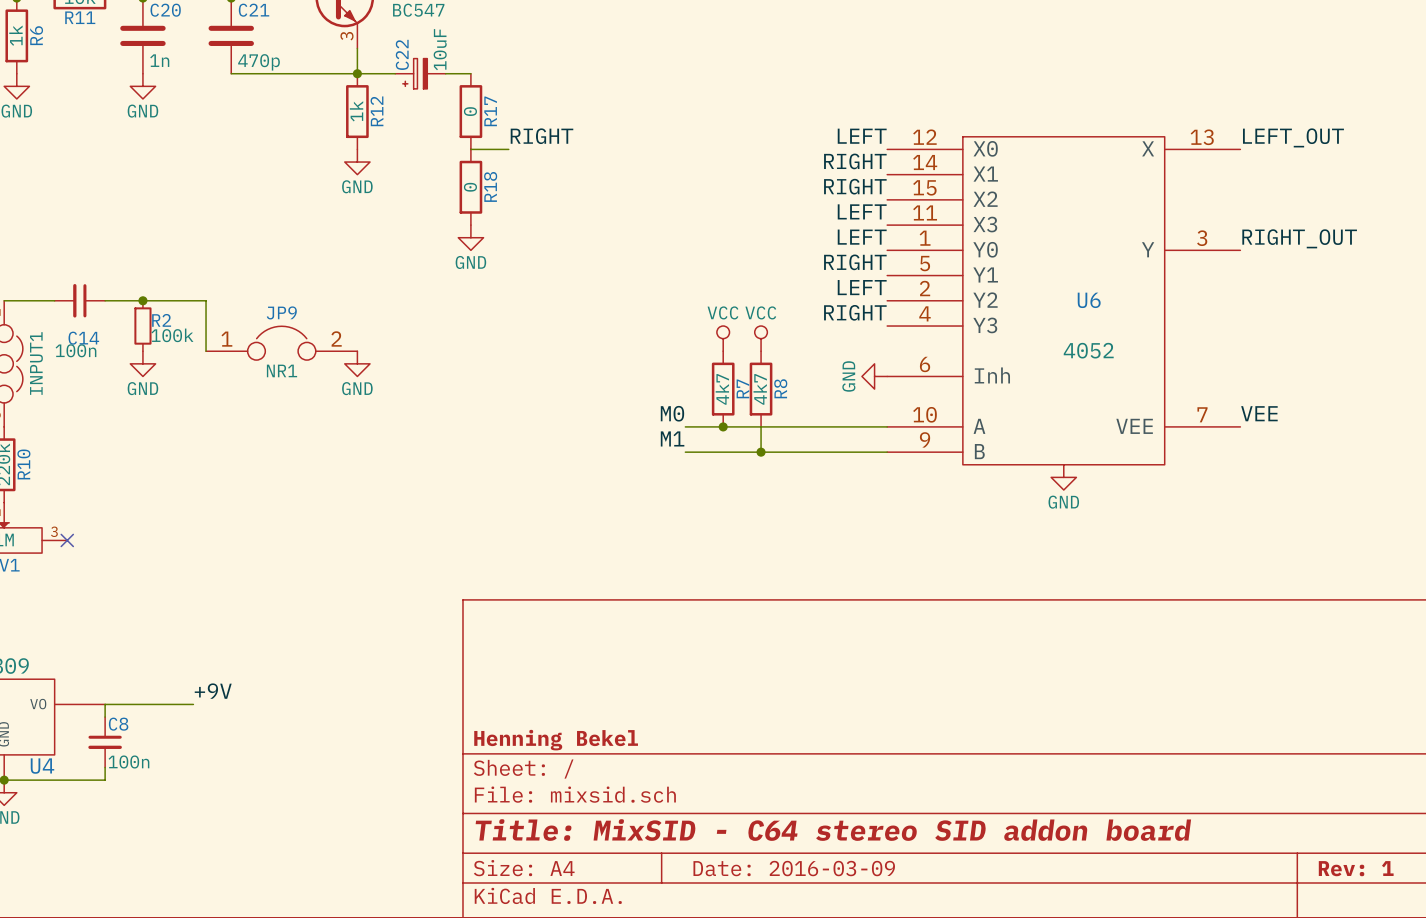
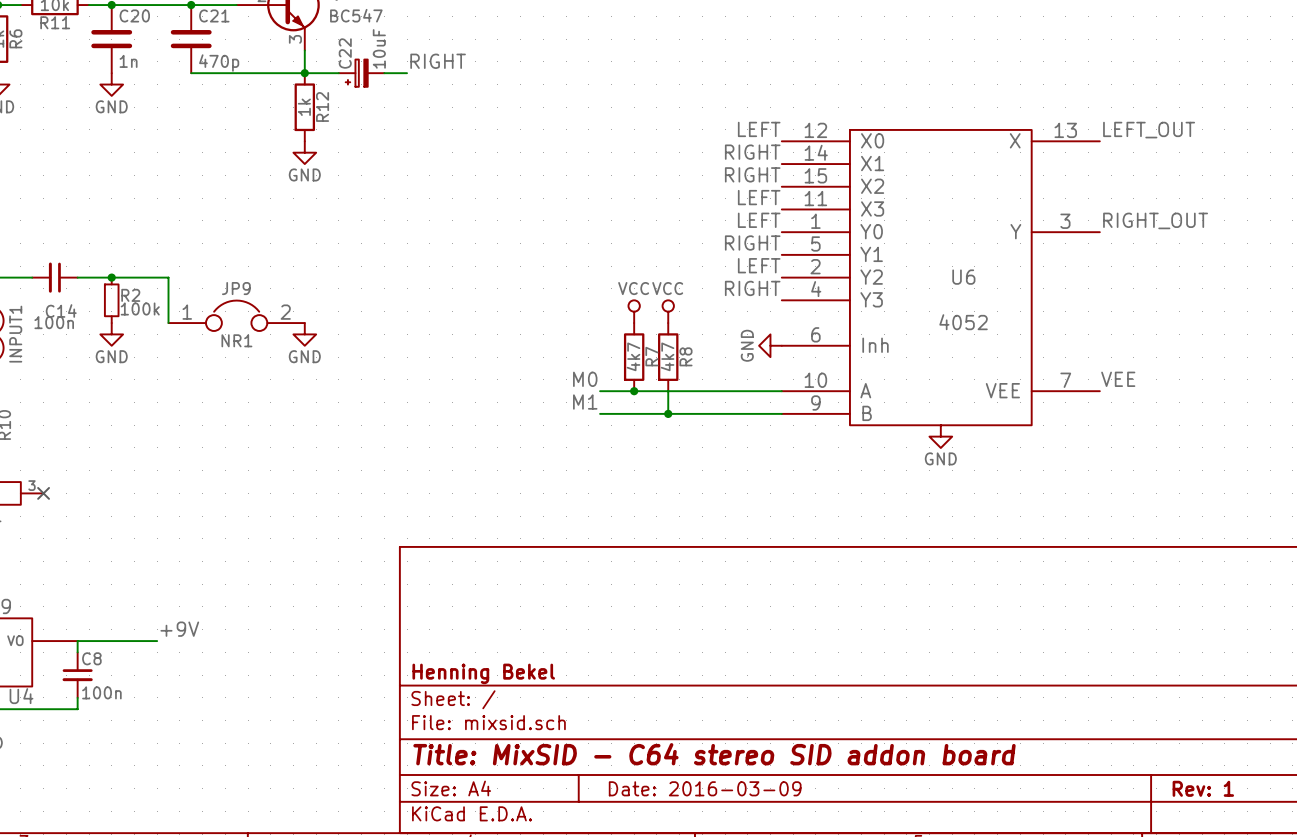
R17: 0 (470, 111) -> none
label position: RIGHT (541, 136) -> RIGHT (438, 61)
wire: (470, 149) (508, 149) -> none
R18: 0 (470, 187) -> none
power symbol: GND (470, 237) -> none

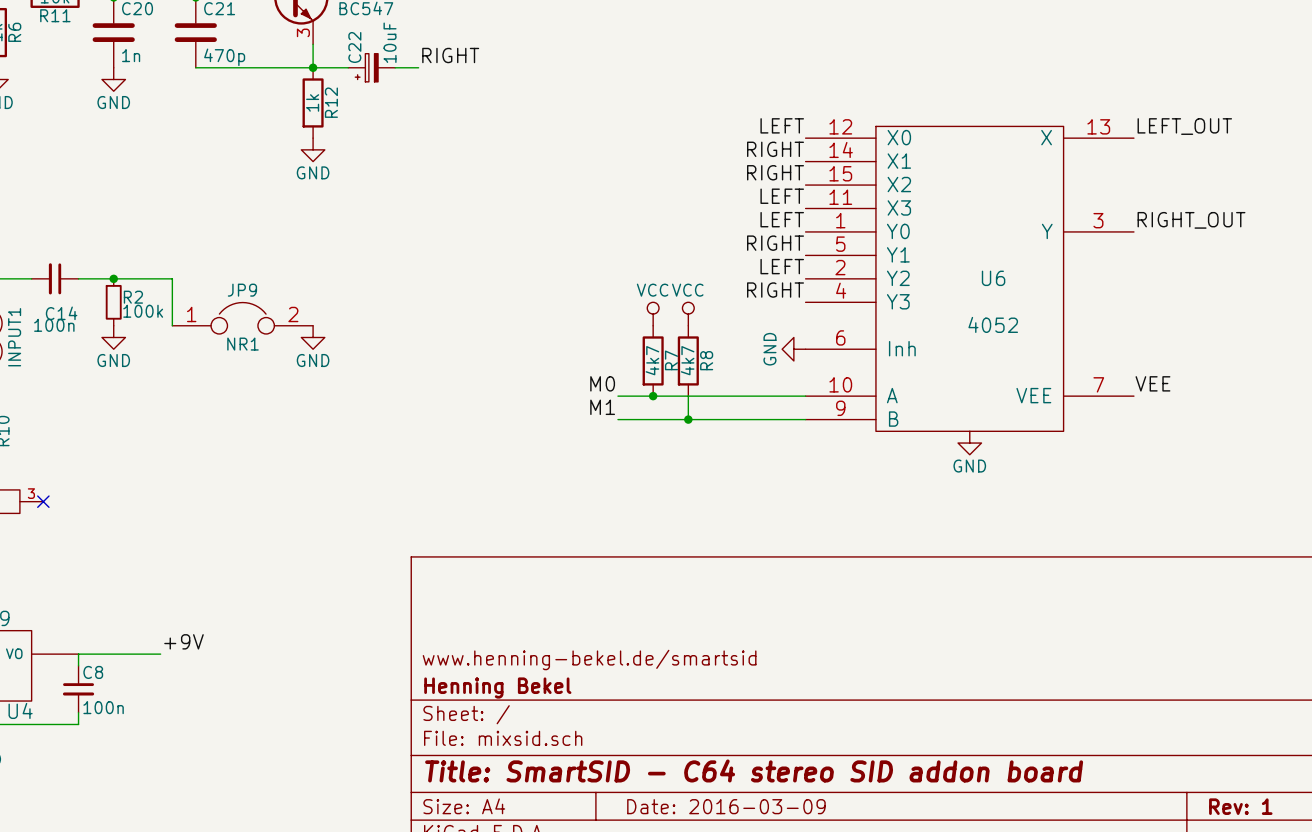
title block: none -> www.henning-bekel.de/smartsid (589, 659)
title block: Title: MixSID - C64 stereo SID addon board (714, 754) -> Title: SmartSID - C64 stereo SID addon board (754, 770)

